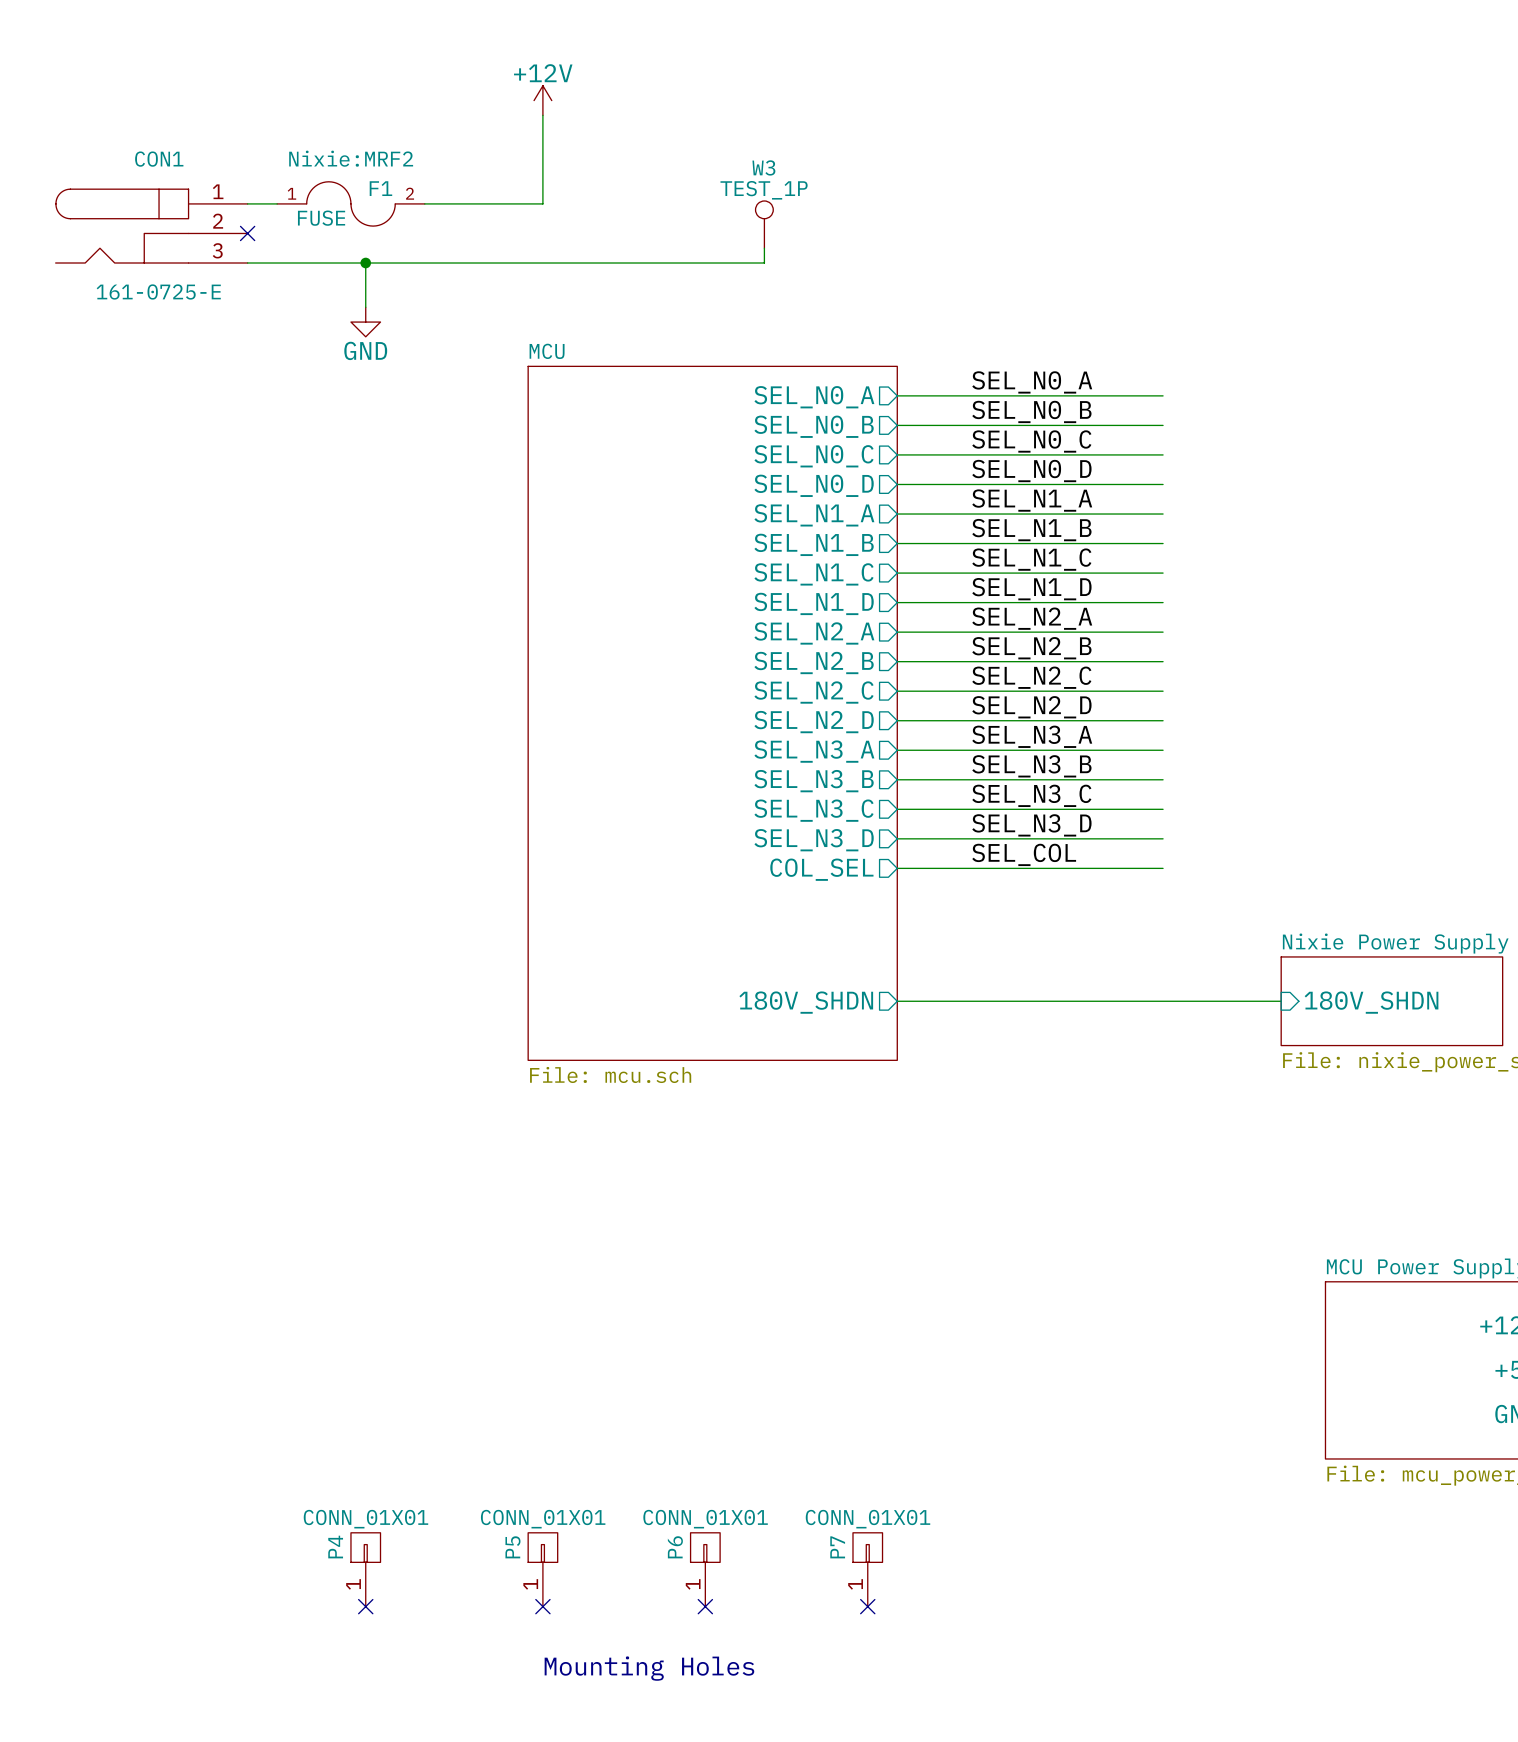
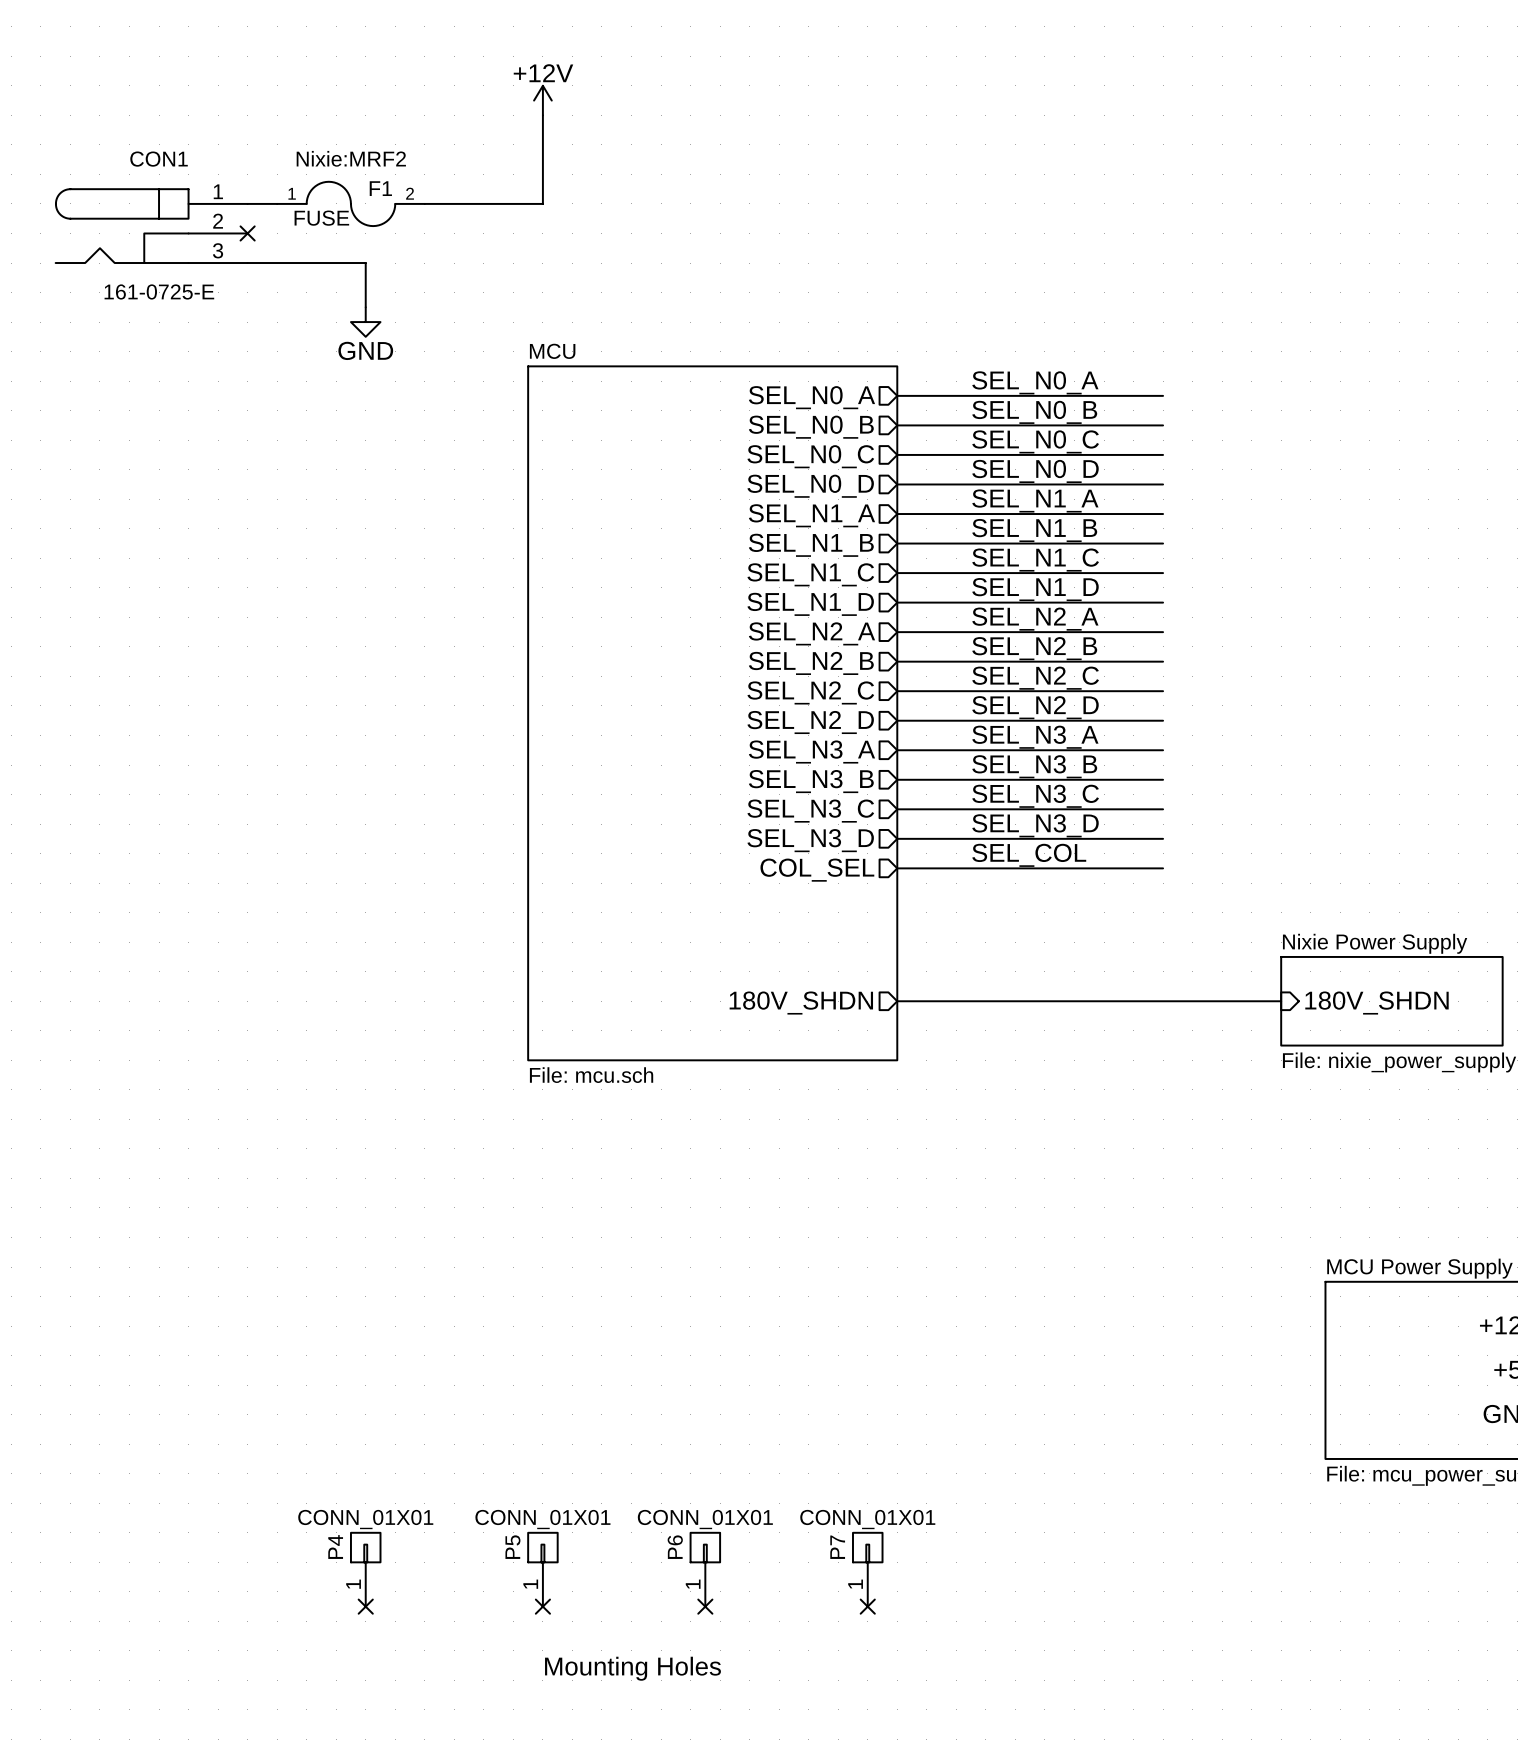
W3: TEST_1P (764, 224) -> none
wire: (764, 248) (764, 263) (365, 263) -> none
junction: (365, 263) -> none

